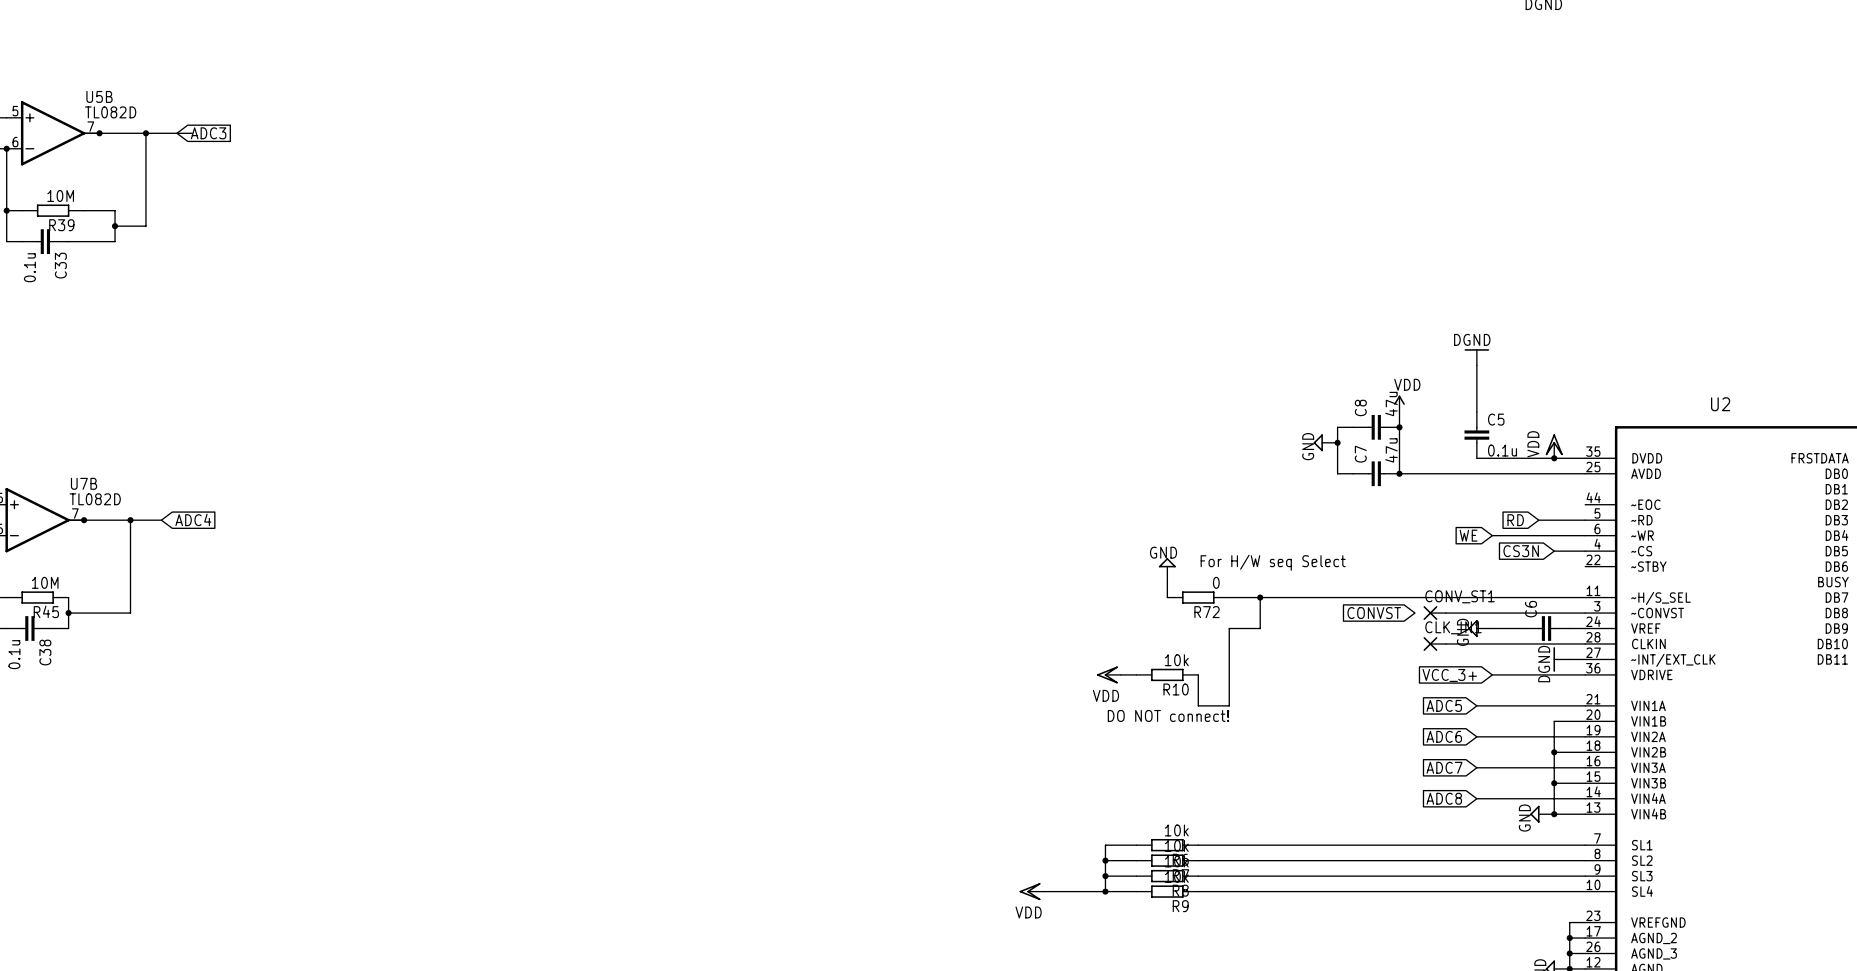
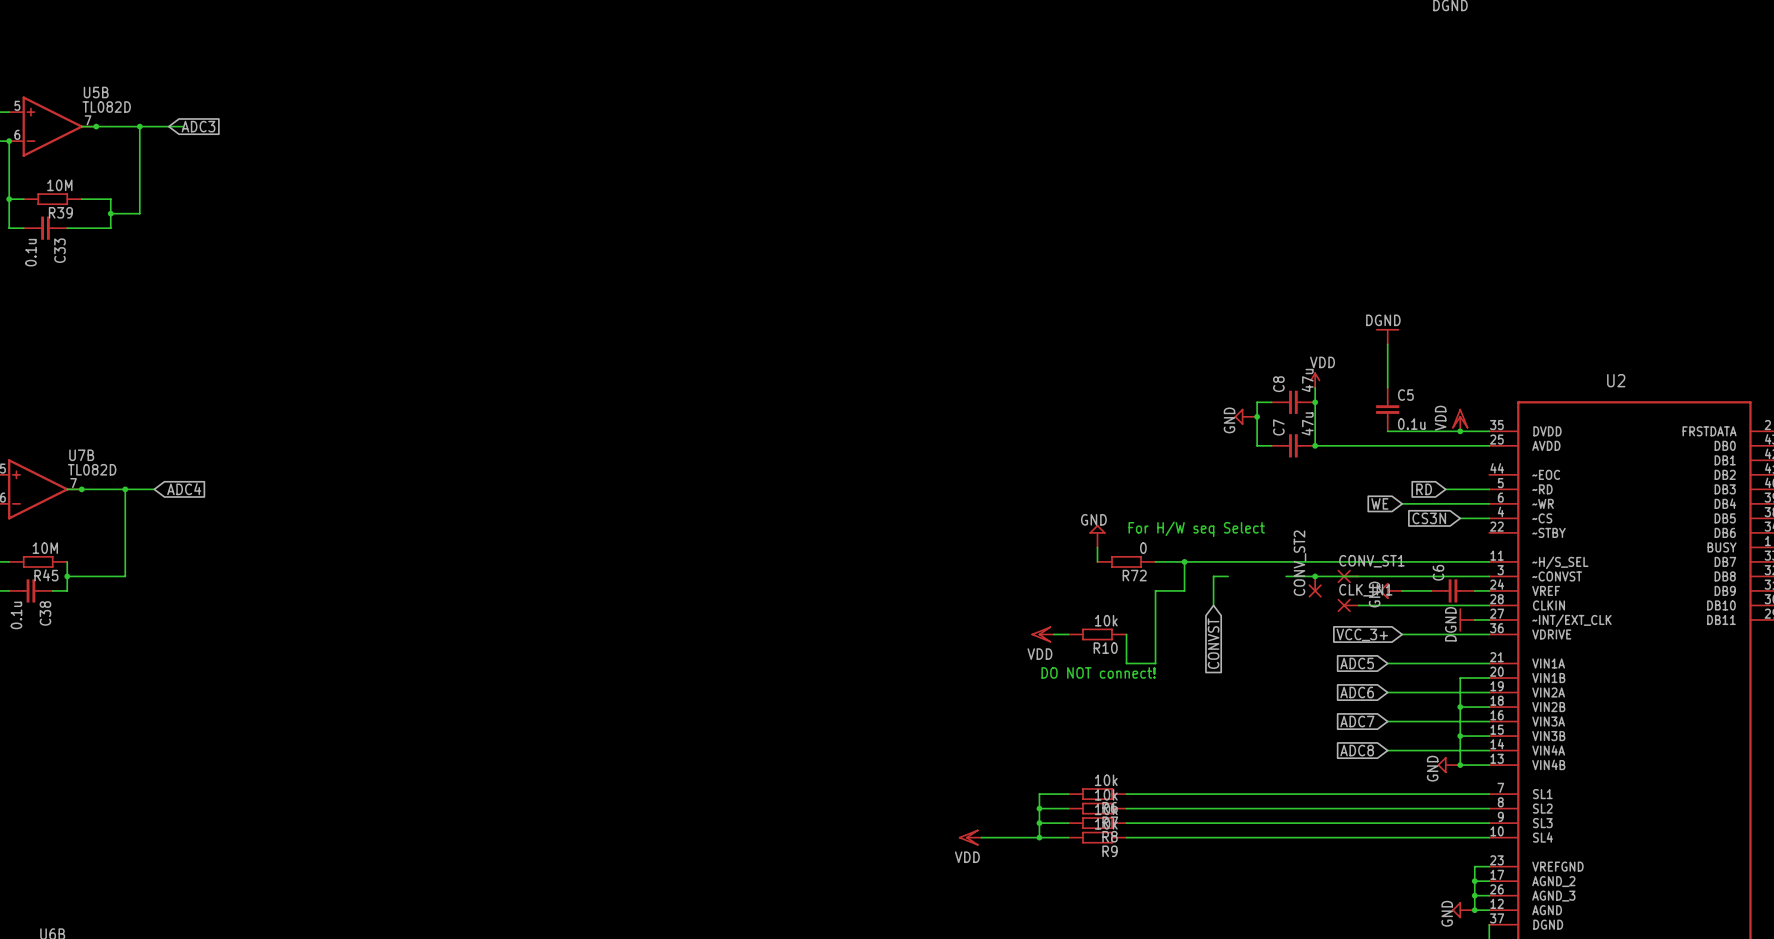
wire: none -> (1228, 576) (1213, 576) (1213, 605)
wire: none -> (1286, 576) (1358, 576)
global label rotation: 0° (1374, 613) -> 90° counterclockwise (1213, 643)
global label position: CONVST (1374, 613) -> CONVST (1213, 643)
junction: none -> (1315, 576)
CONV_ST2: none -> (1315, 586)

